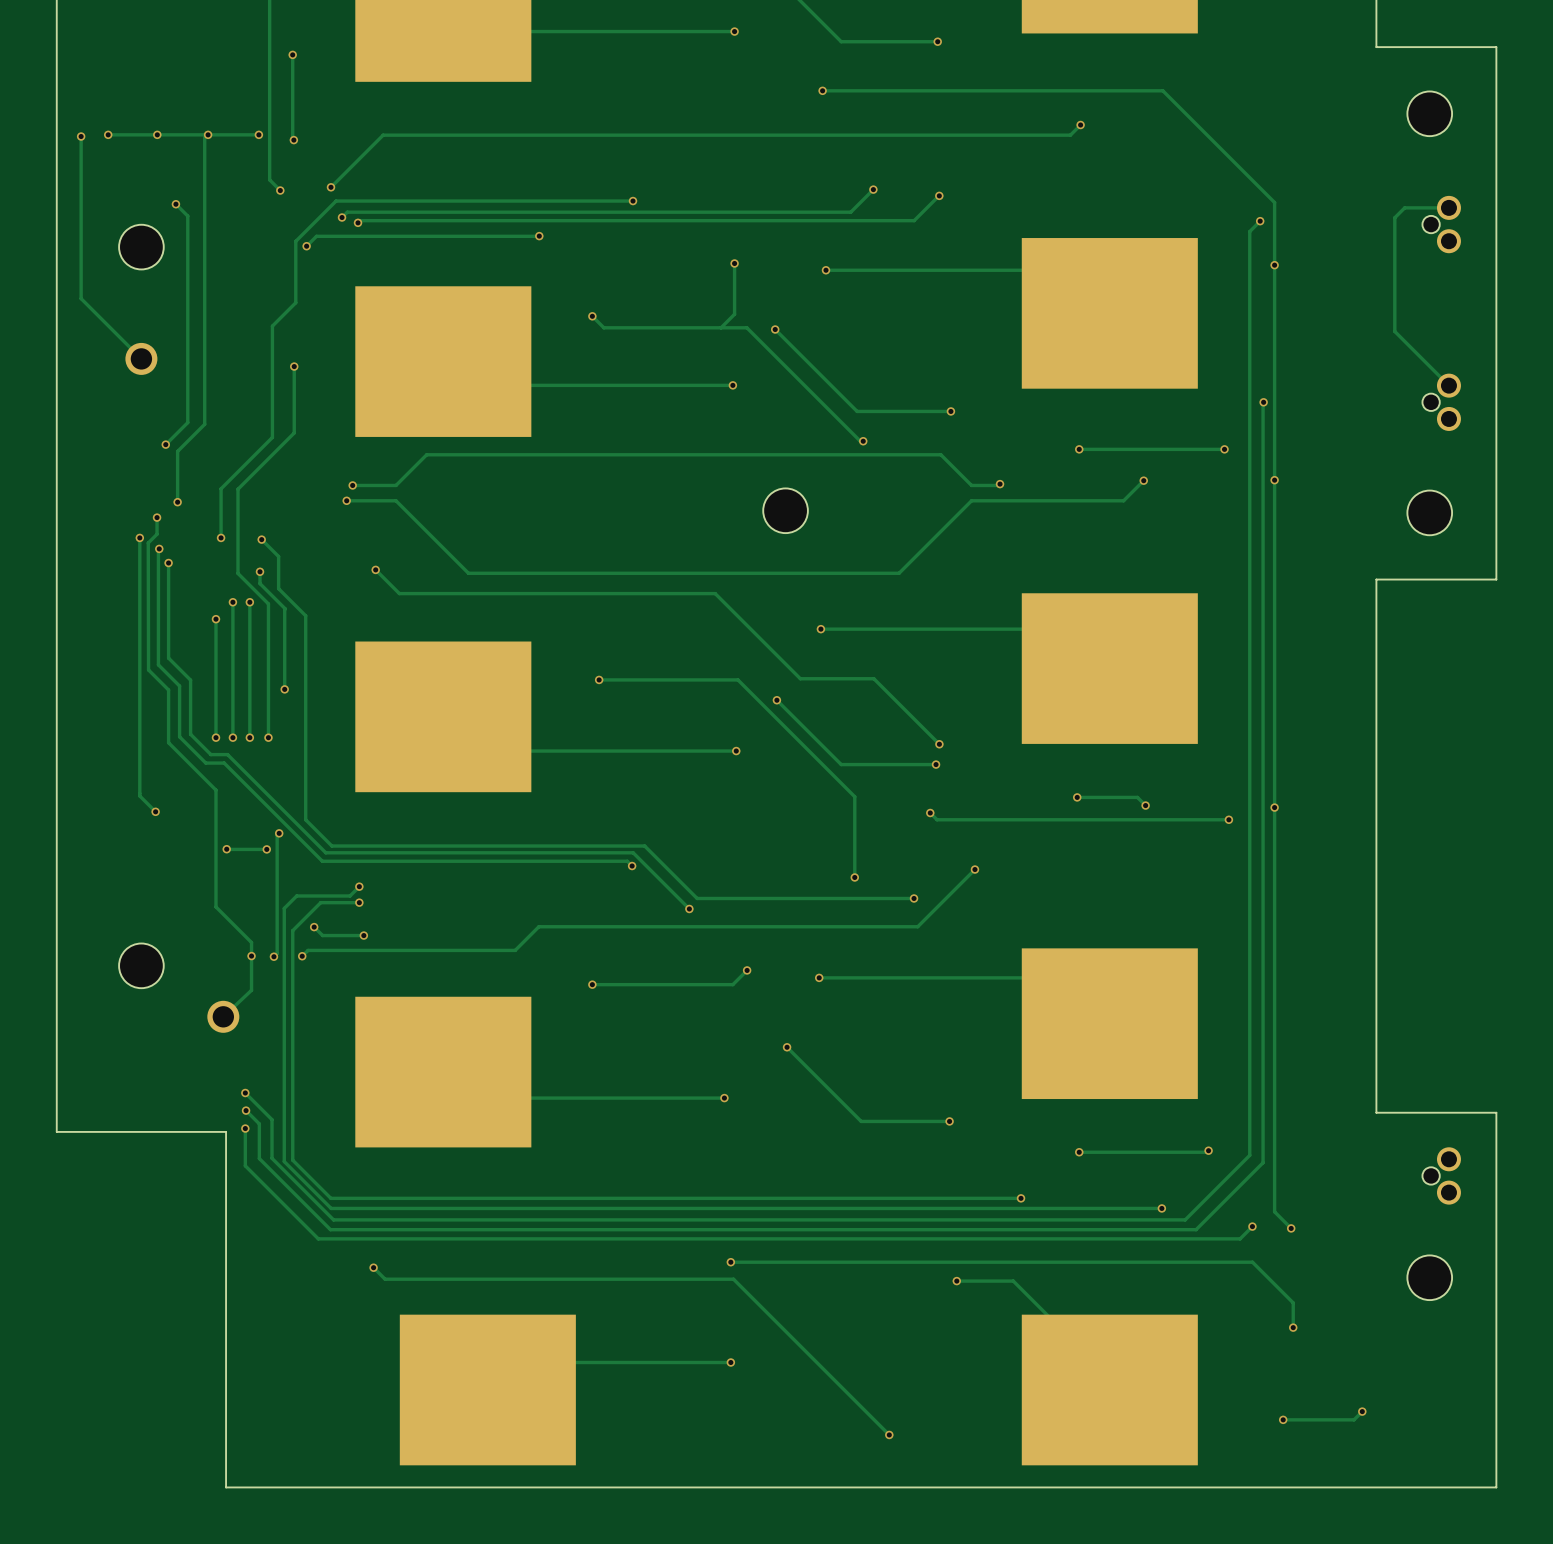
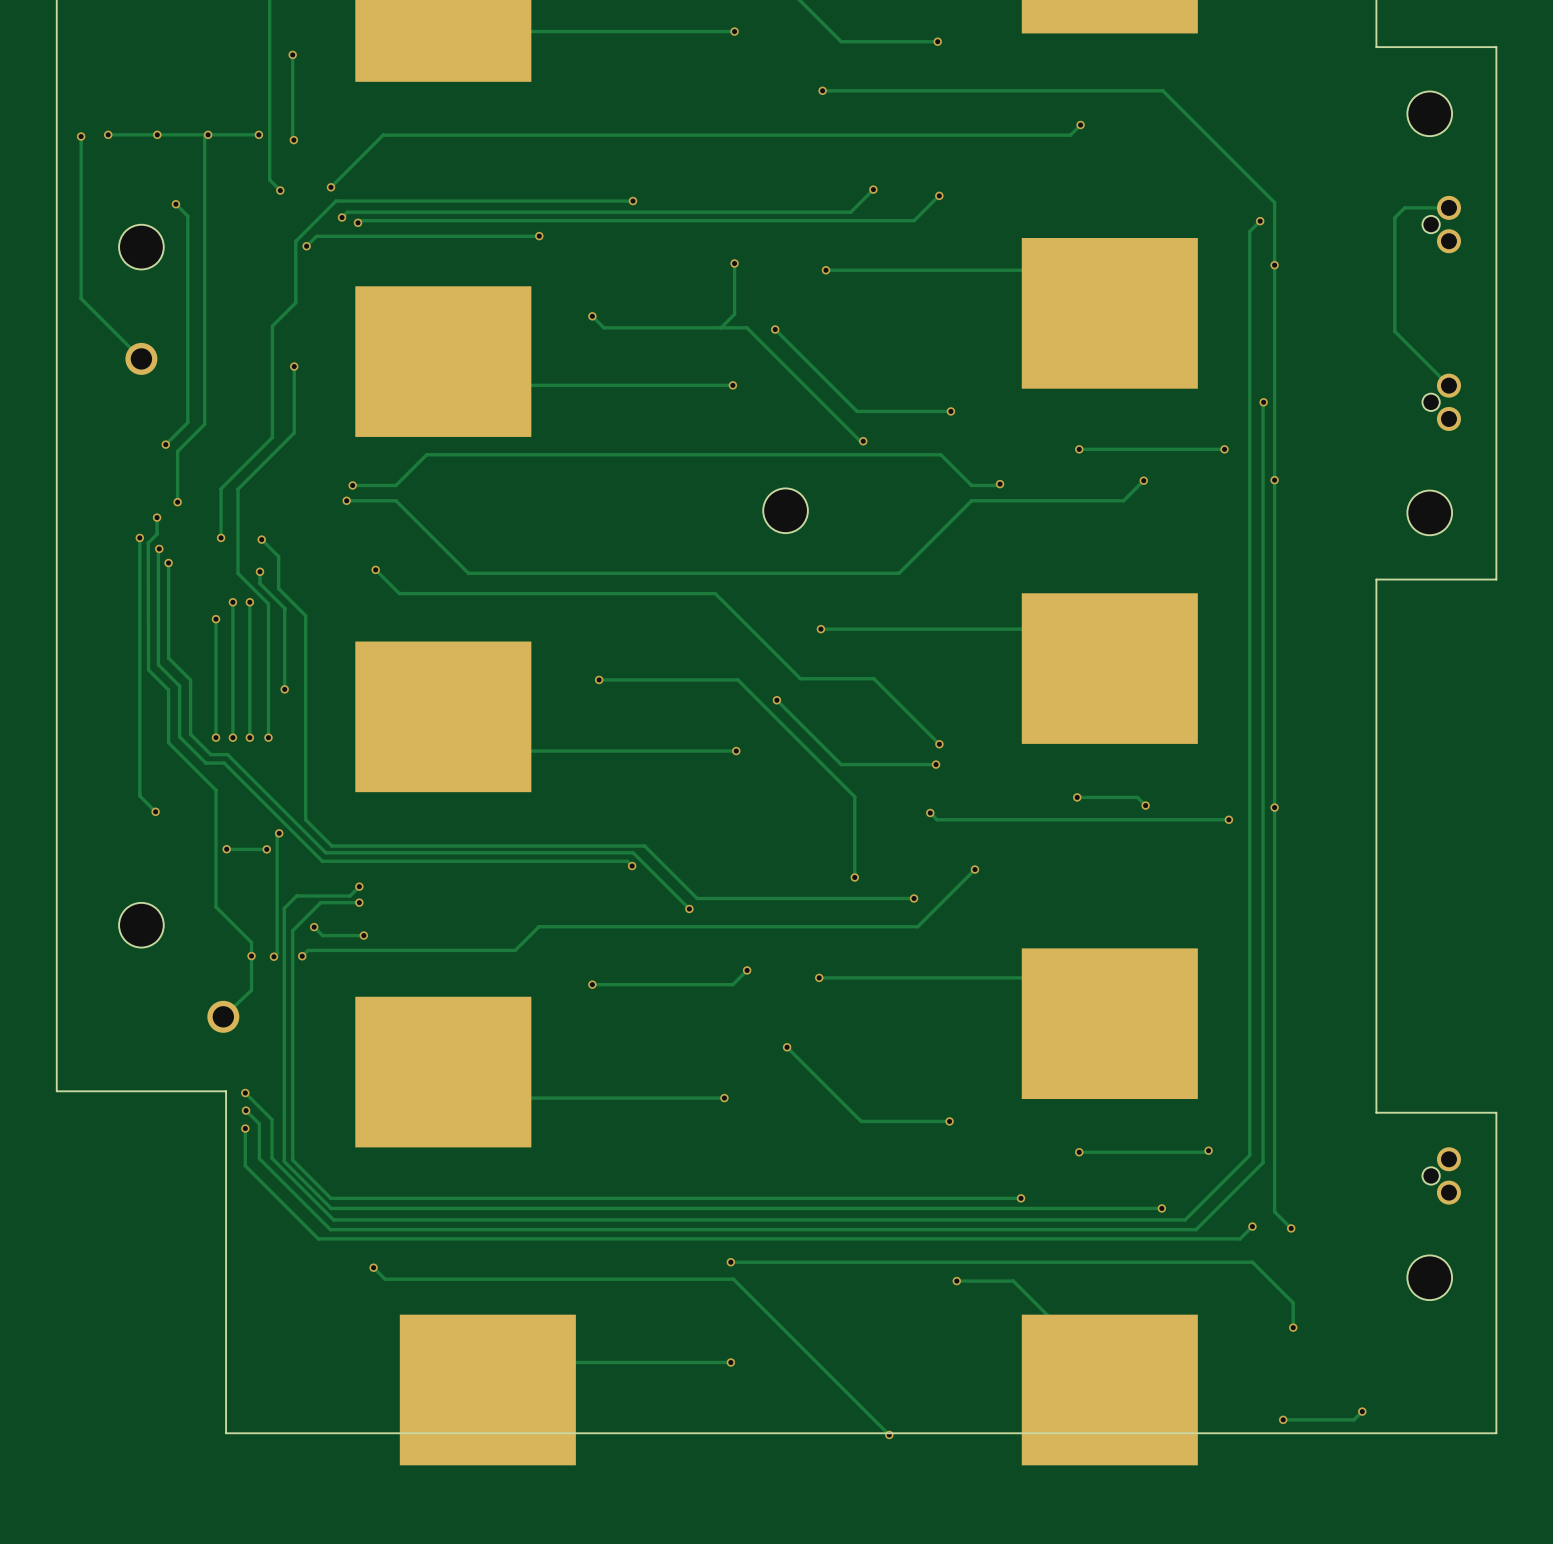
part position: (141, 965) -> (141, 925)
board edge: (56, 1091) (56, 1131) (226, 1131) -> (56, 1091) (226, 1091) (226, 1131)
board edge: (1496, 1433) (1496, 1487) (226, 1487) (226, 1433) -> (1496, 1433) (226, 1433)

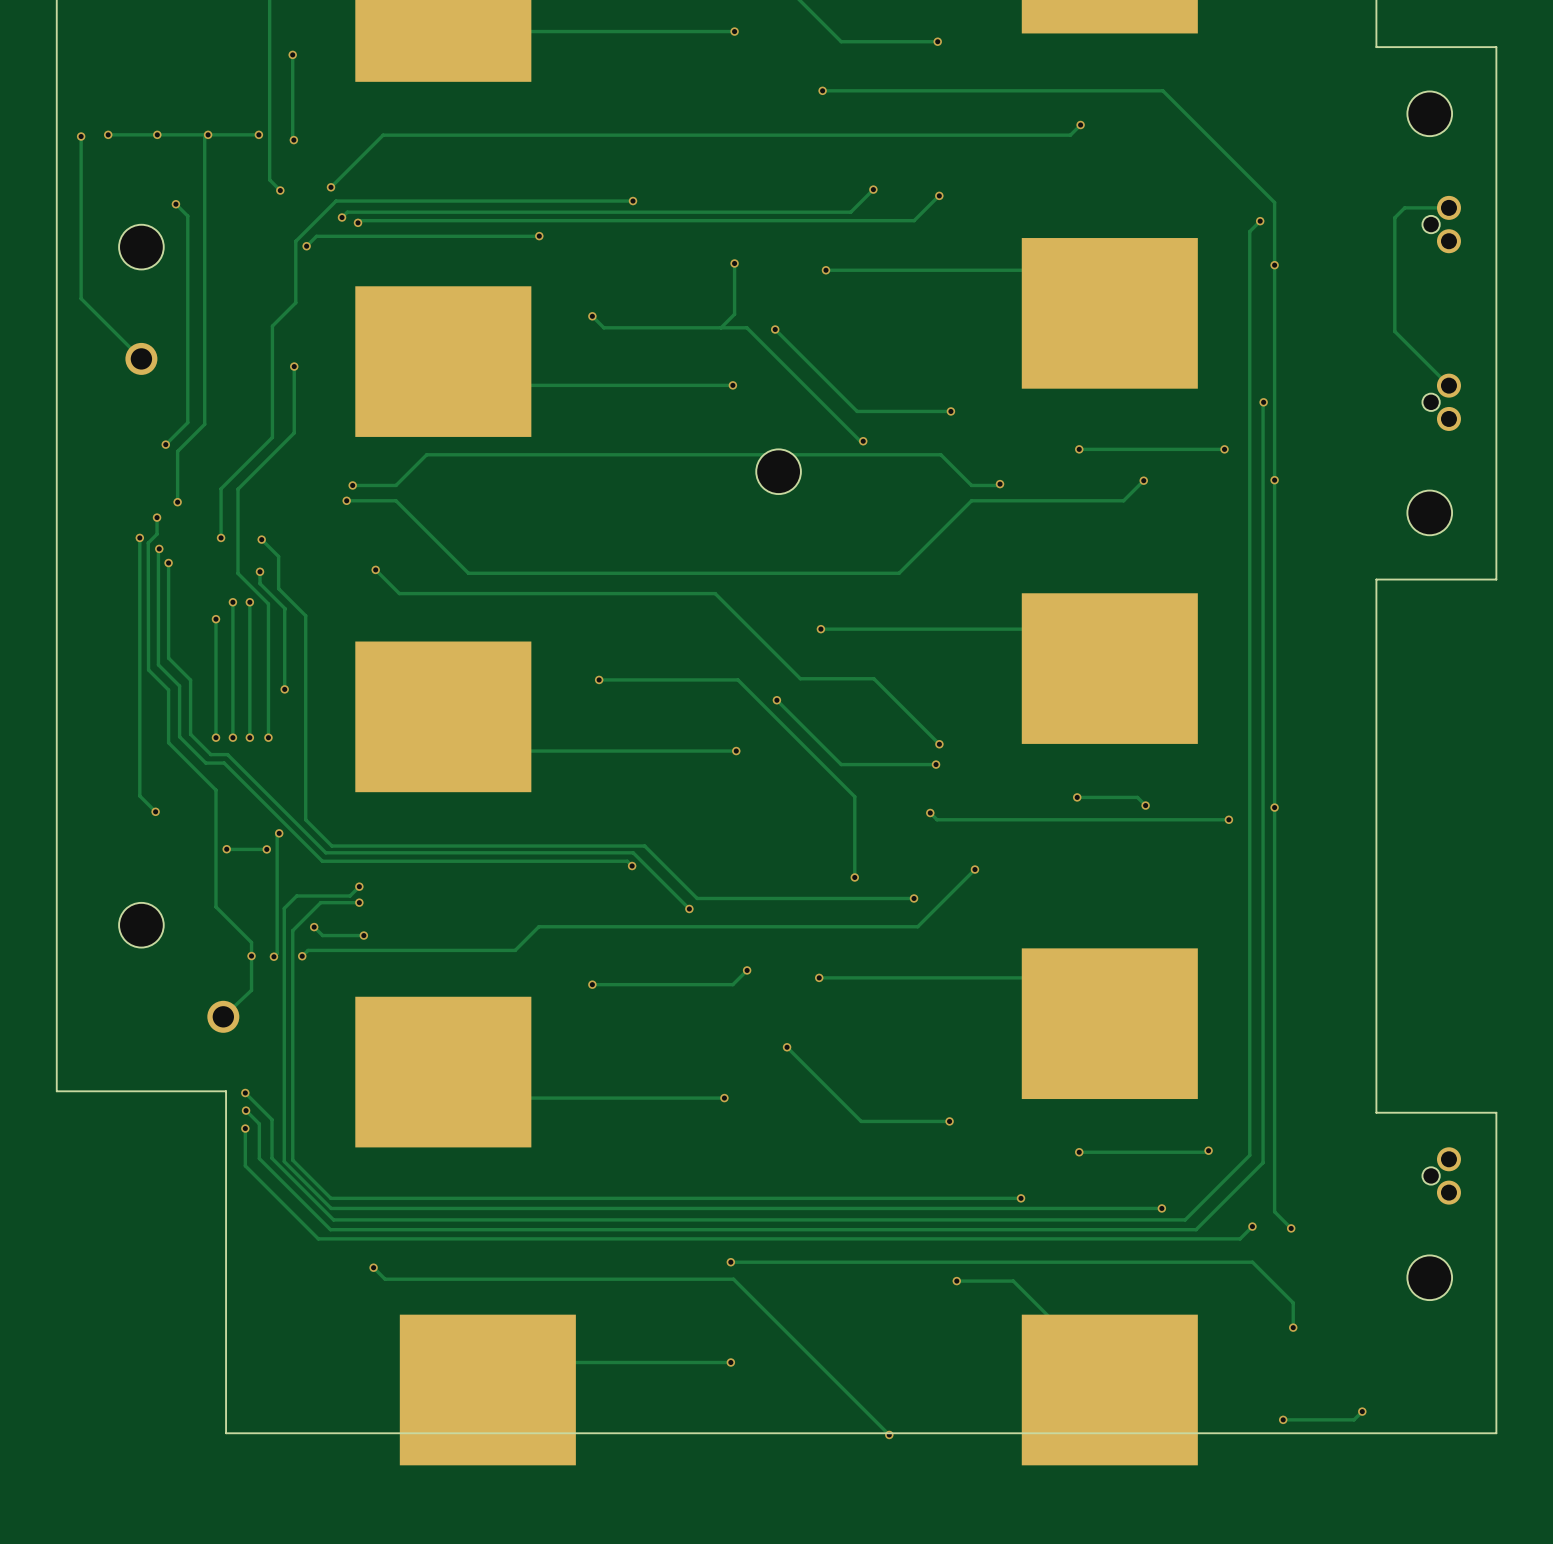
part position: (785, 510) -> (778, 471)

